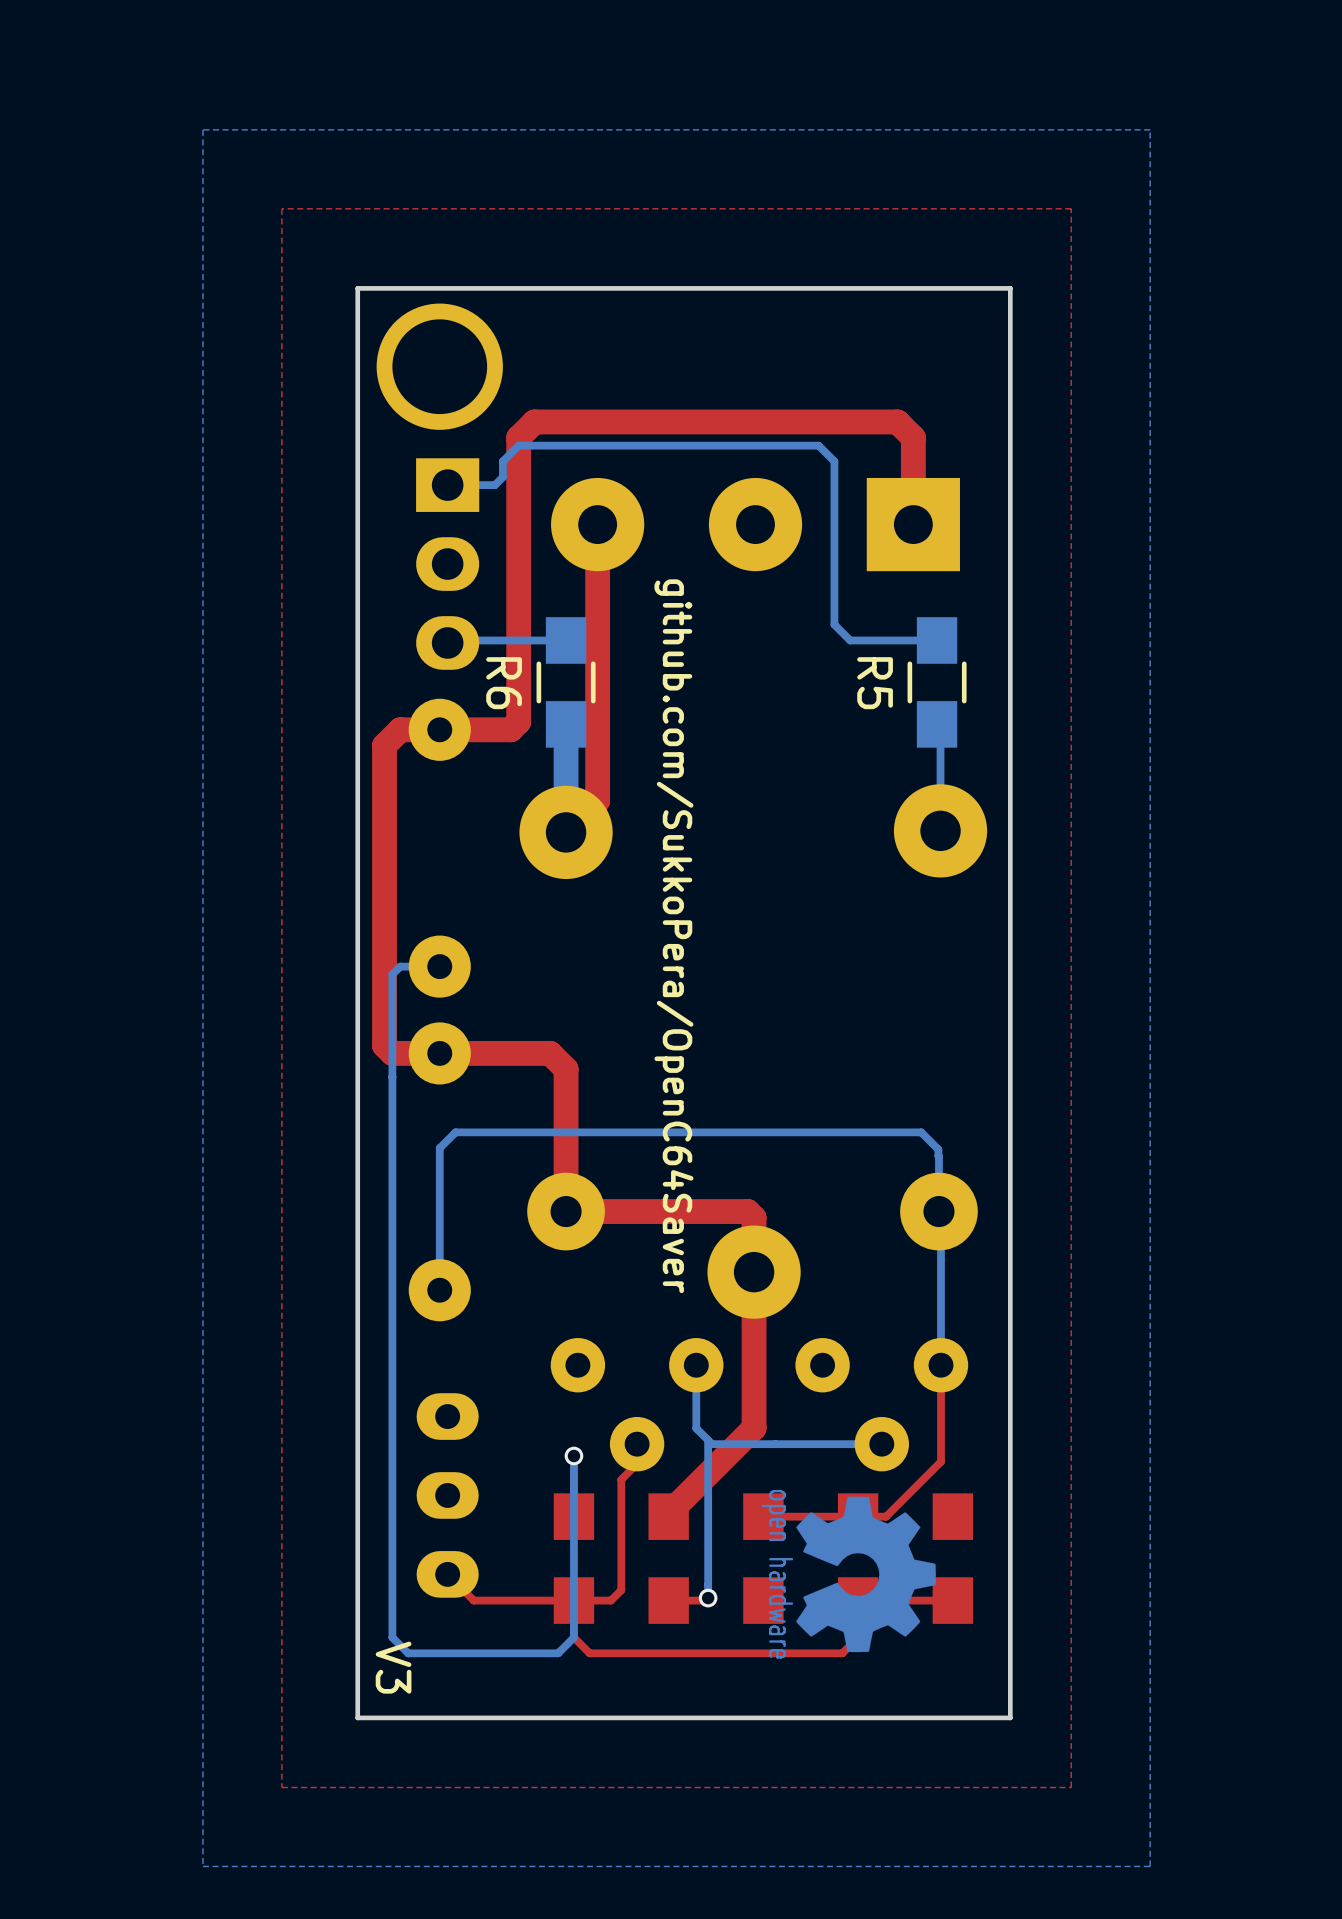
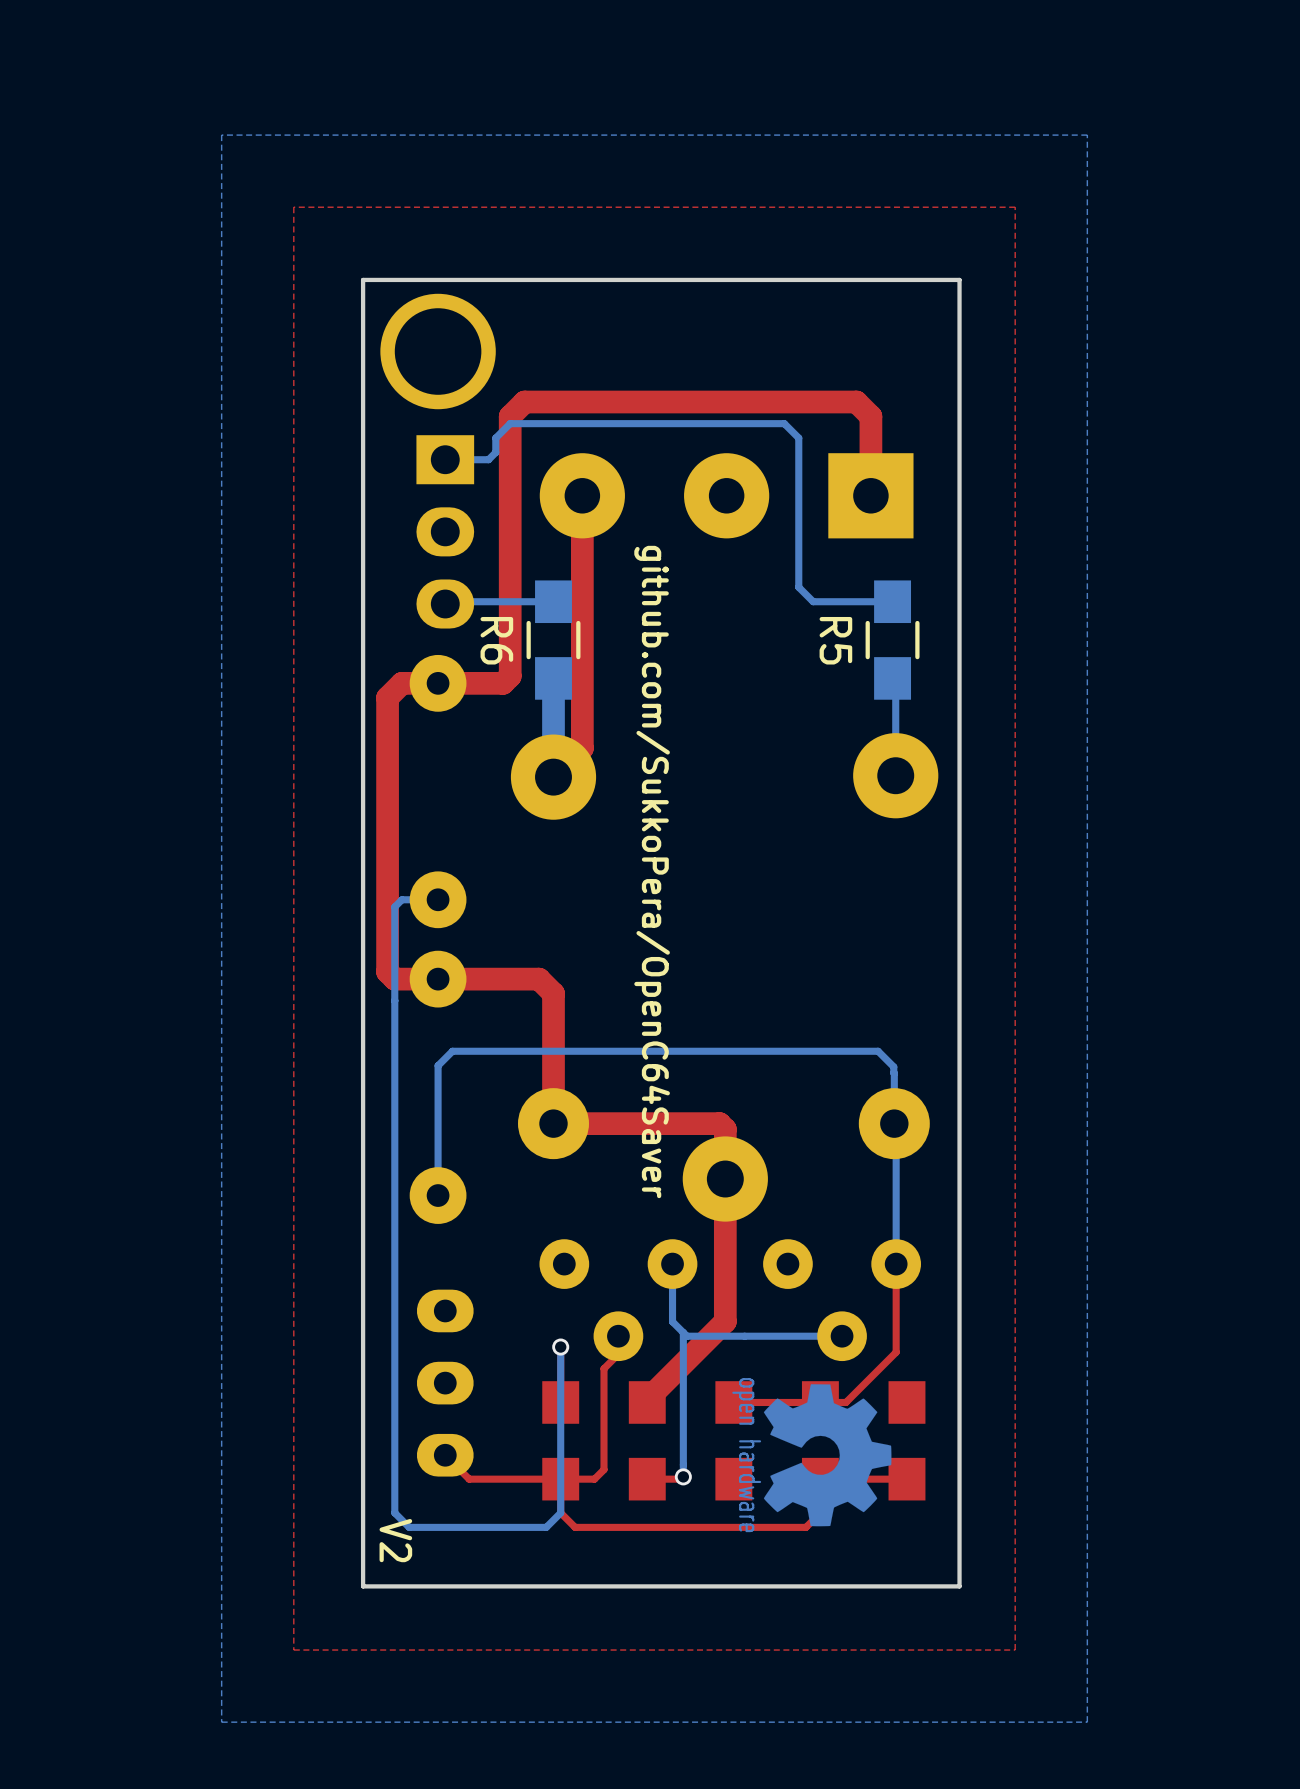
text: V3 (393, 1667) -> V2 (395, 1540)

